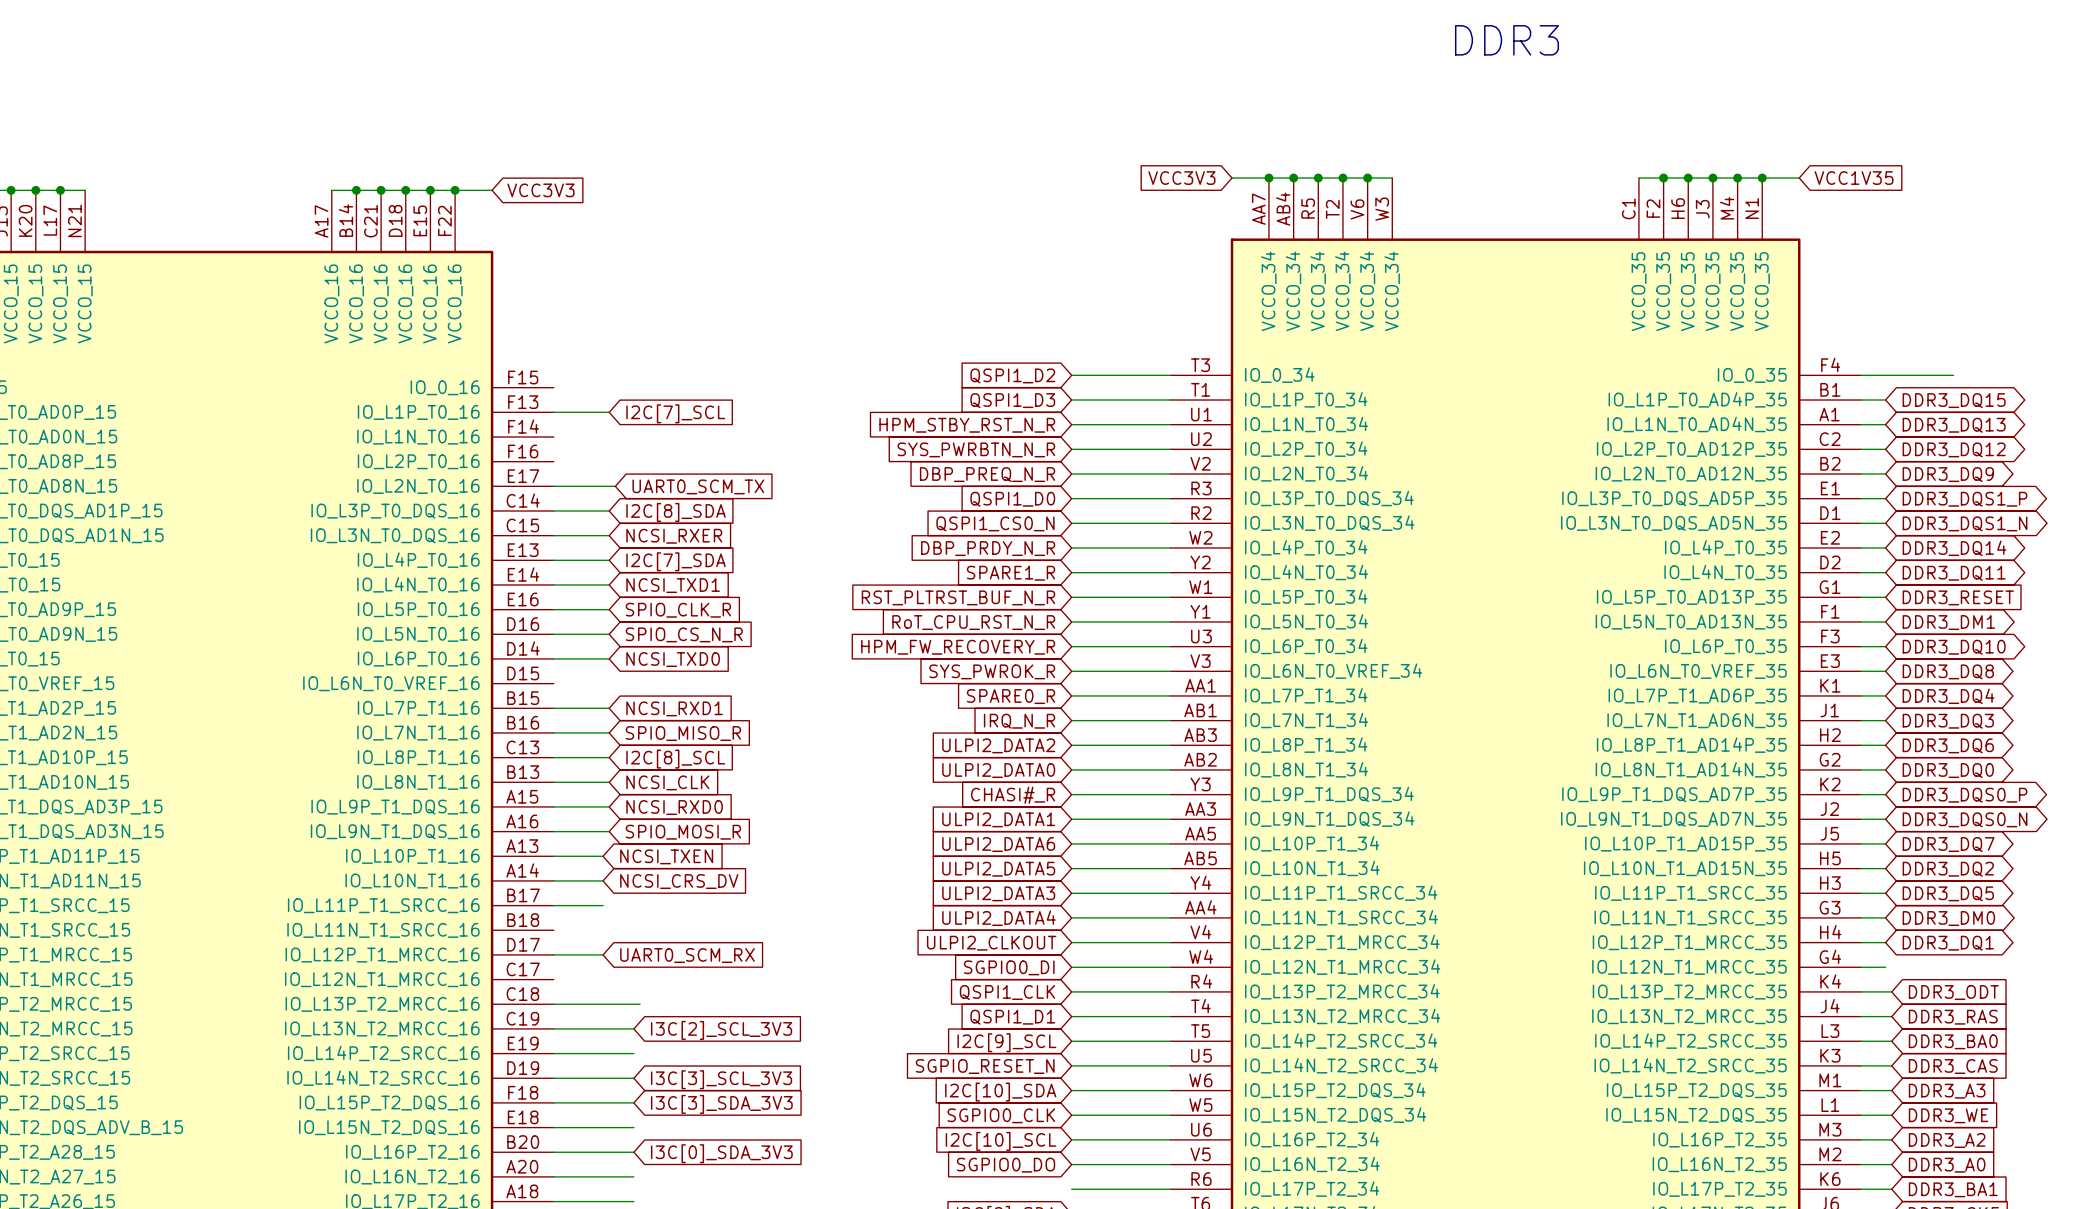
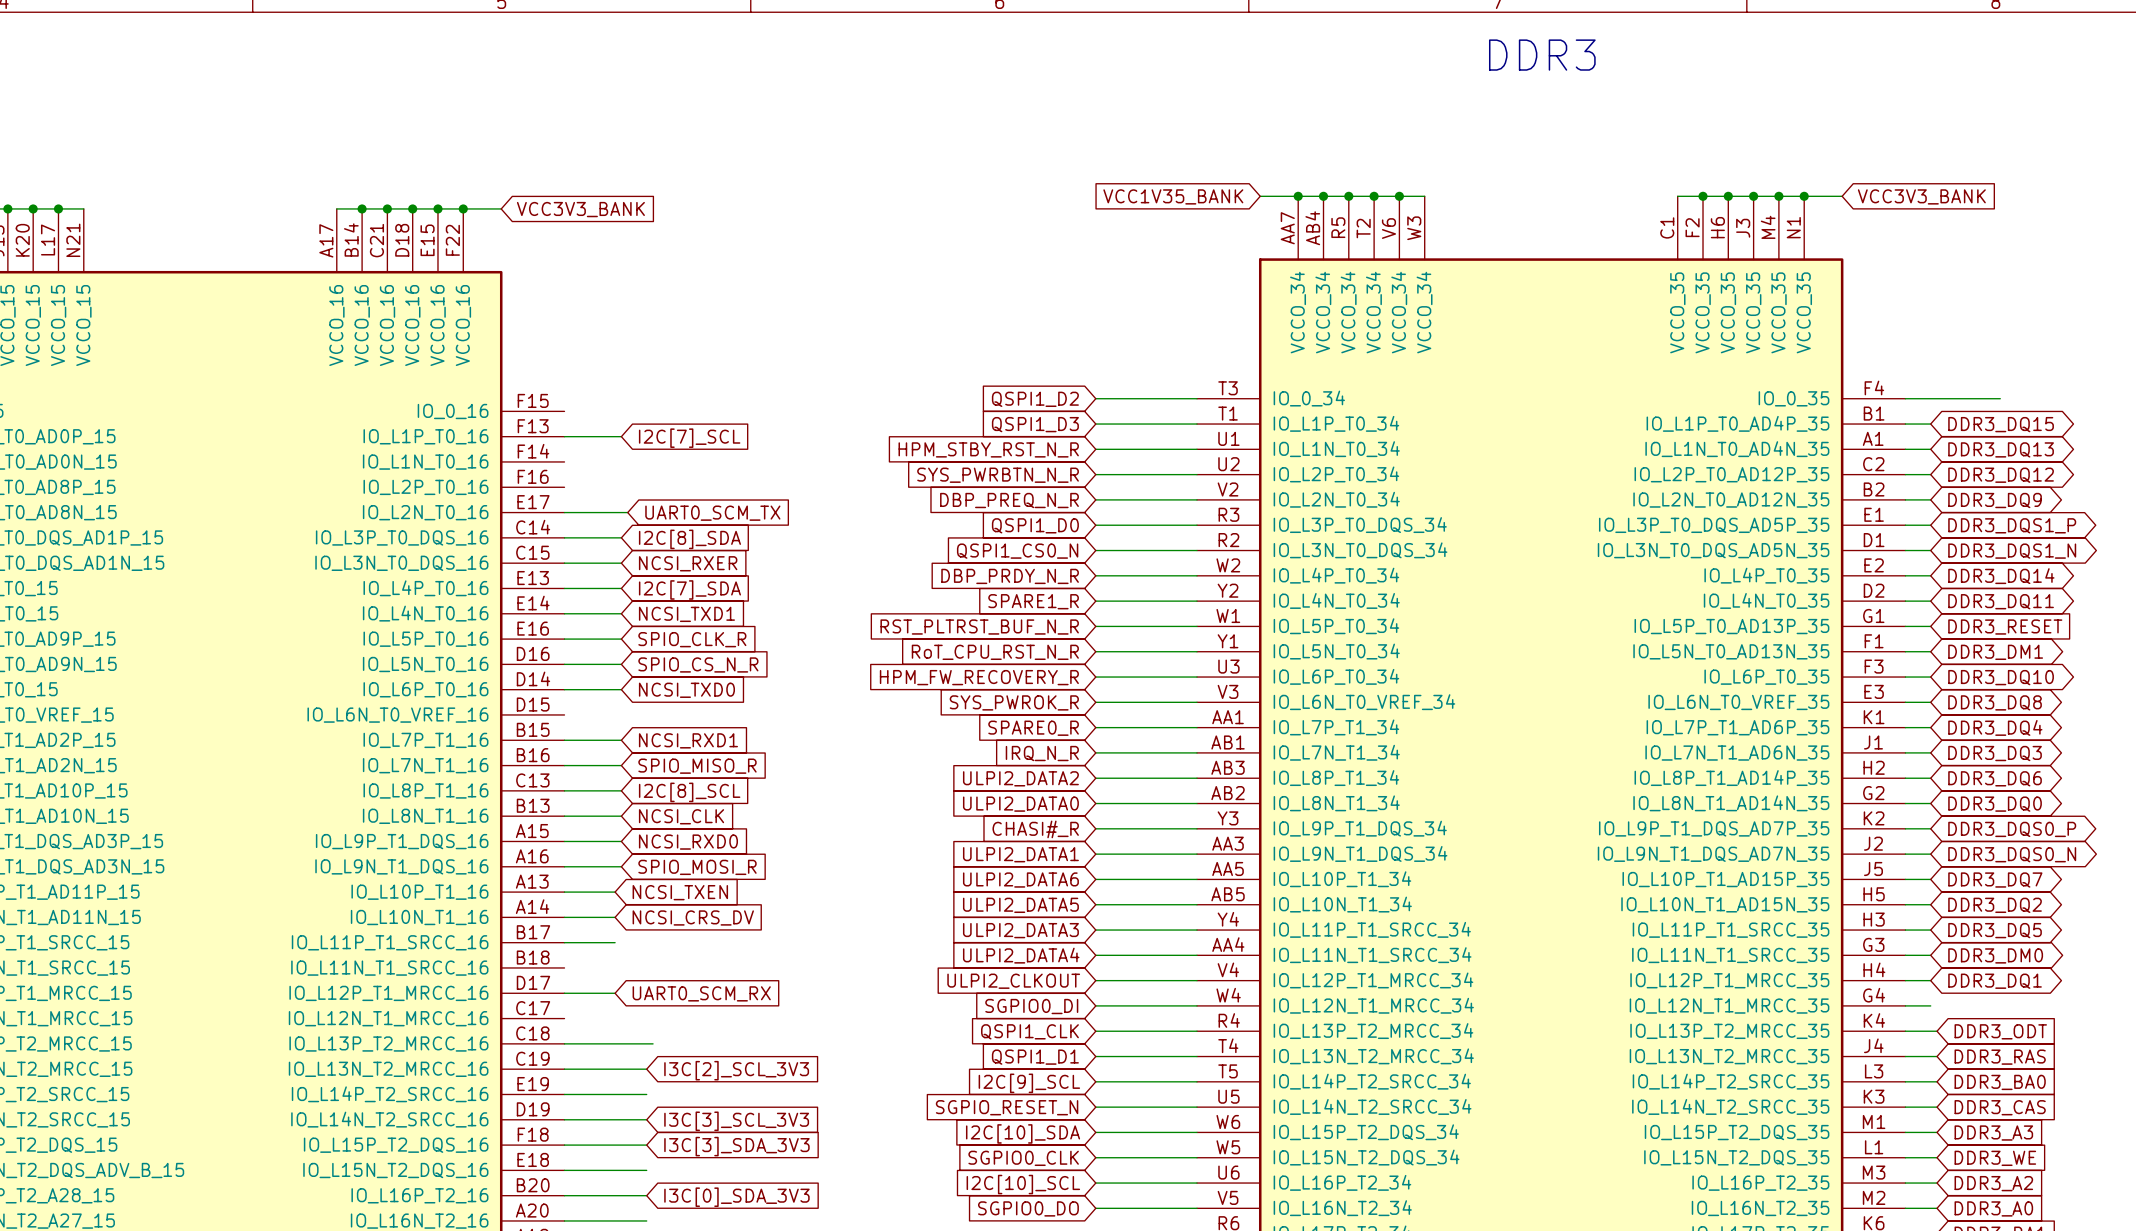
global label: VCC3V3 (1181, 178) -> VCC1V35_BANK (1173, 196)
global label: VCC1V35 (1854, 178) -> VCC3V3_BANK (1921, 196)
global label: VCC3V3 (540, 190) -> VCC3V3_BANK (580, 209)

